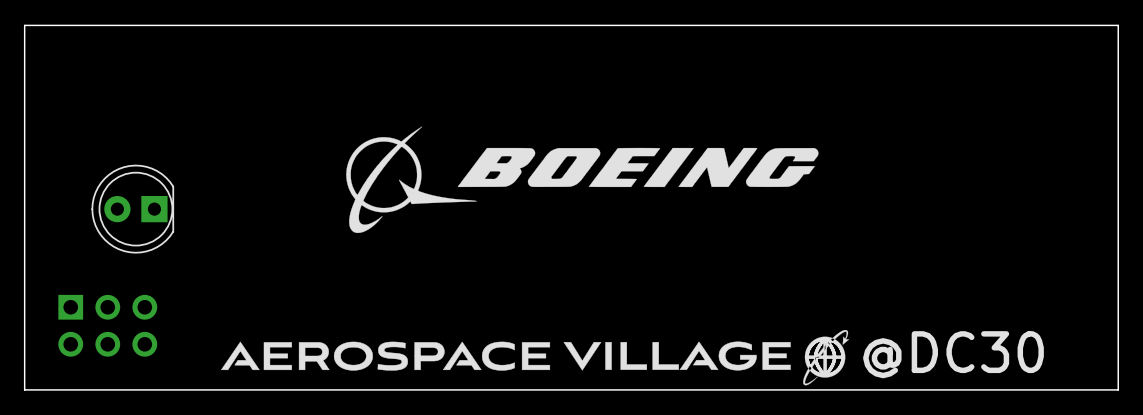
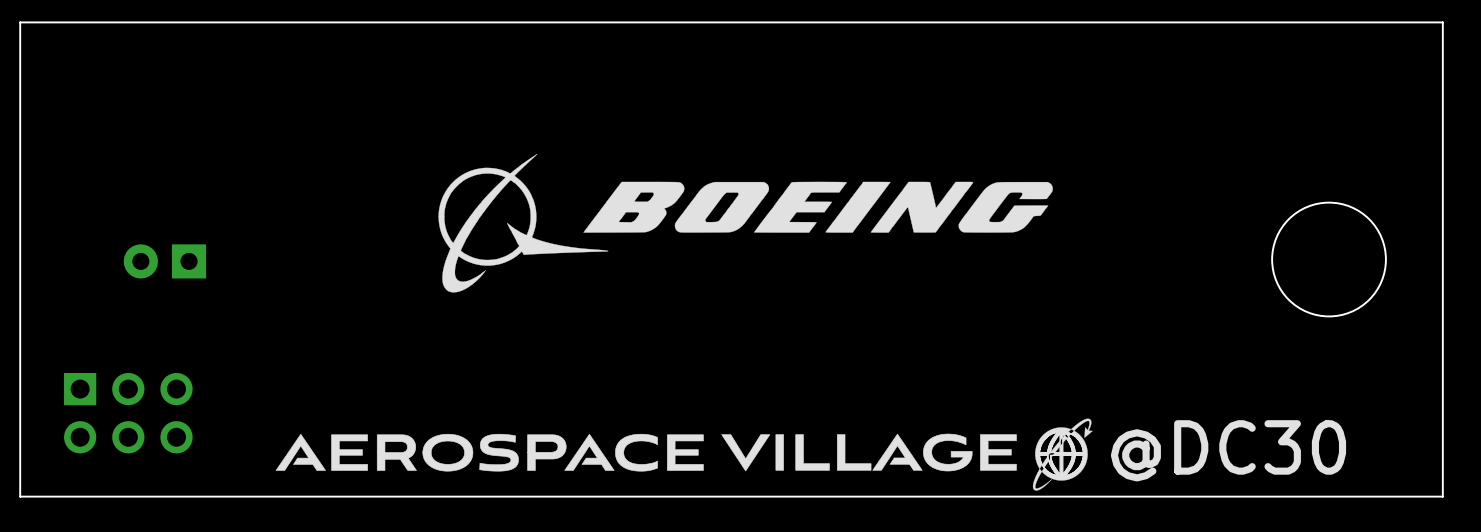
round board edge: none -> [1271, 201, 1387, 318]
part footprint: [91, 164, 175, 254] -> [123, 244, 207, 279]

